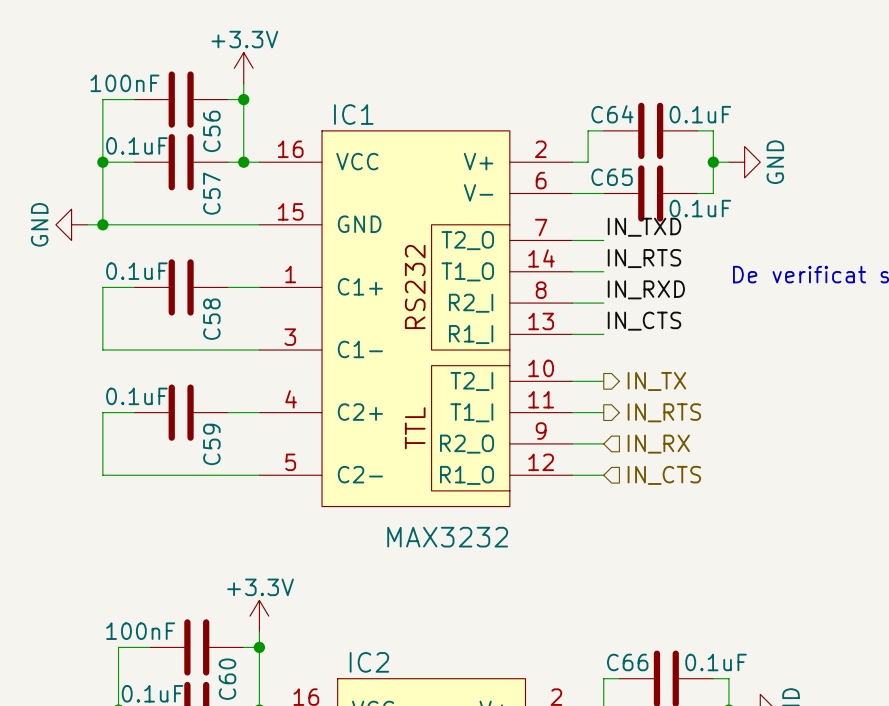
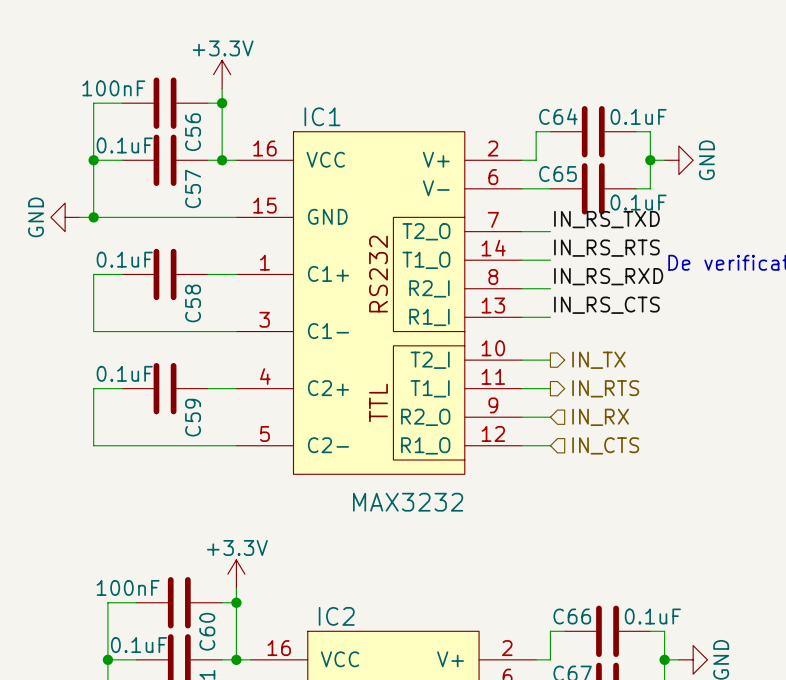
label: IN_TXD (644, 227) -> IN_RS_TXD (606, 219)
label: IN_RTS (644, 258) -> IN_RS_RTS (606, 248)
label: IN_RXD (646, 289) -> IN_RS_RXD (608, 276)
label: IN_CTS (644, 321) -> IN_RS_CTS (606, 305)

